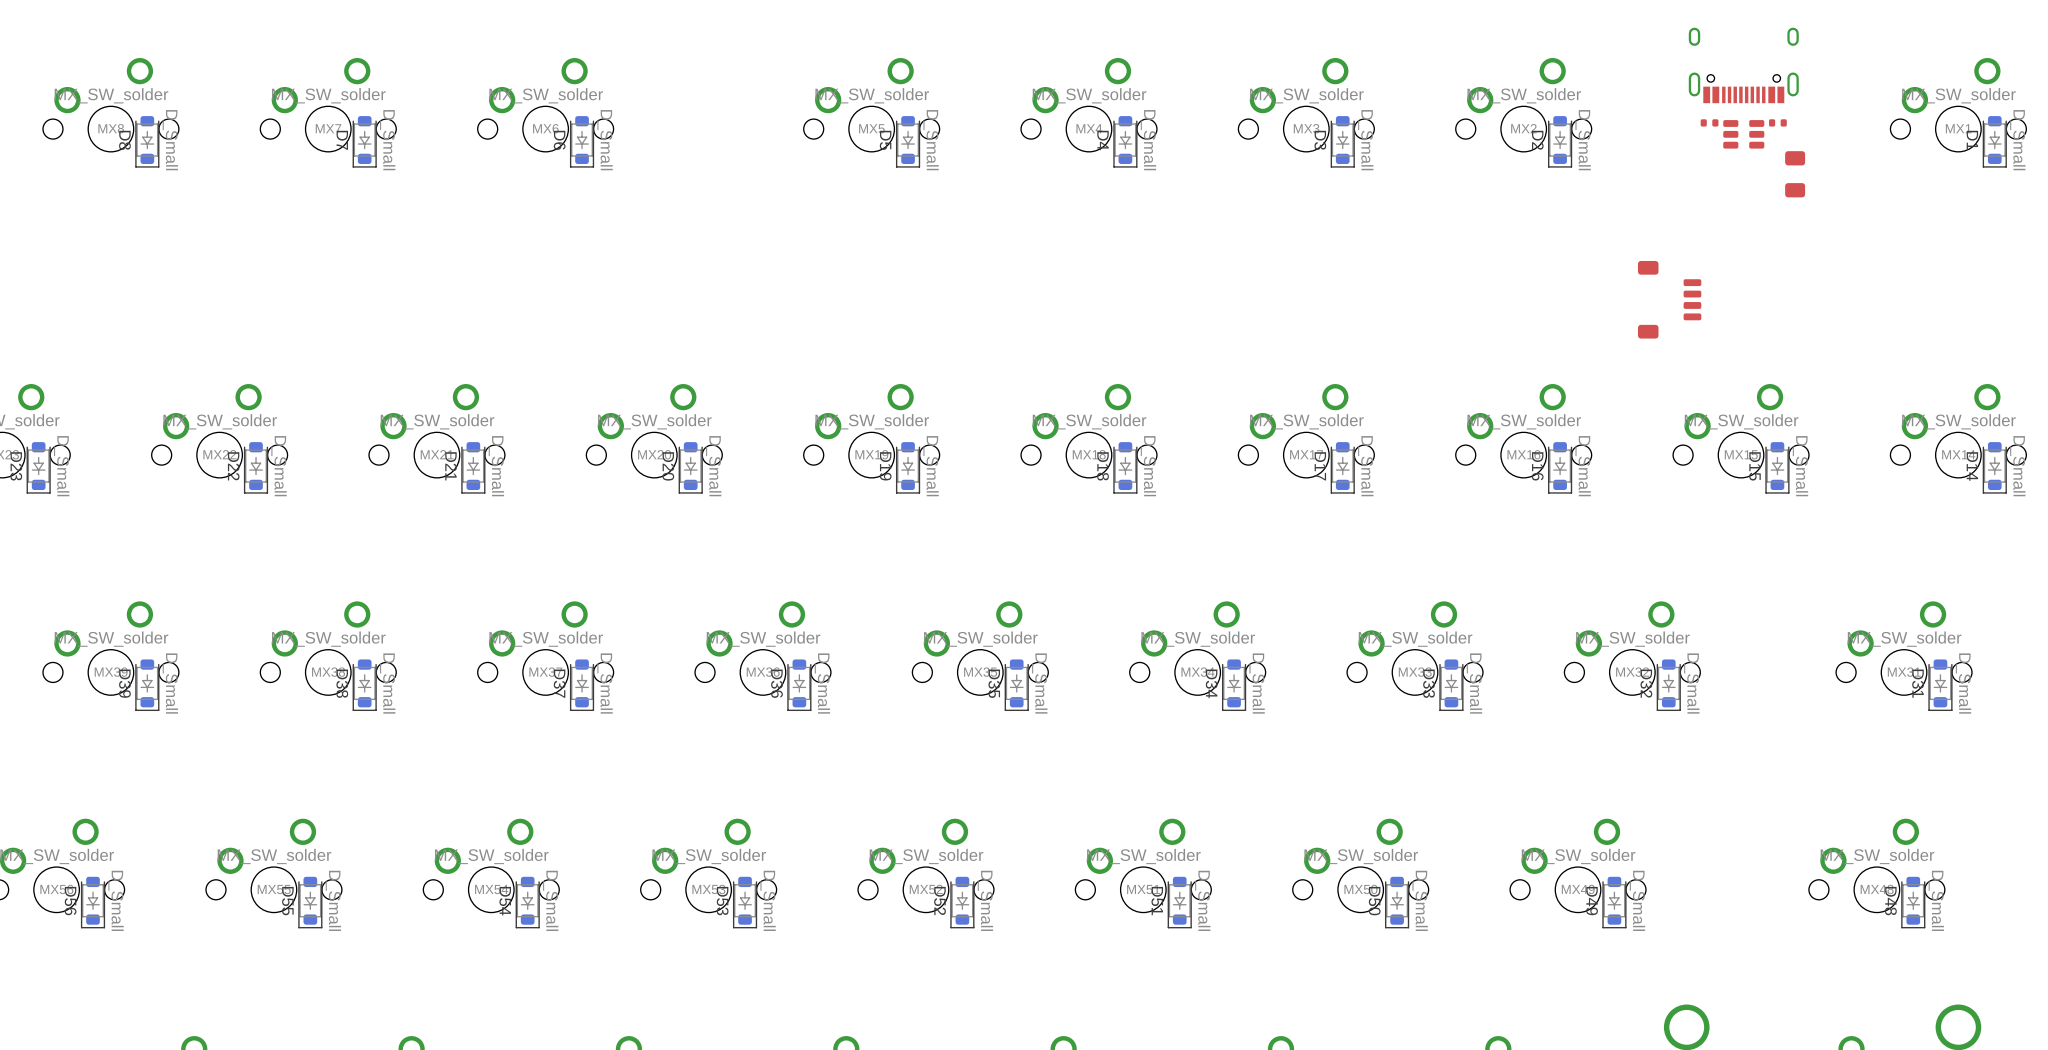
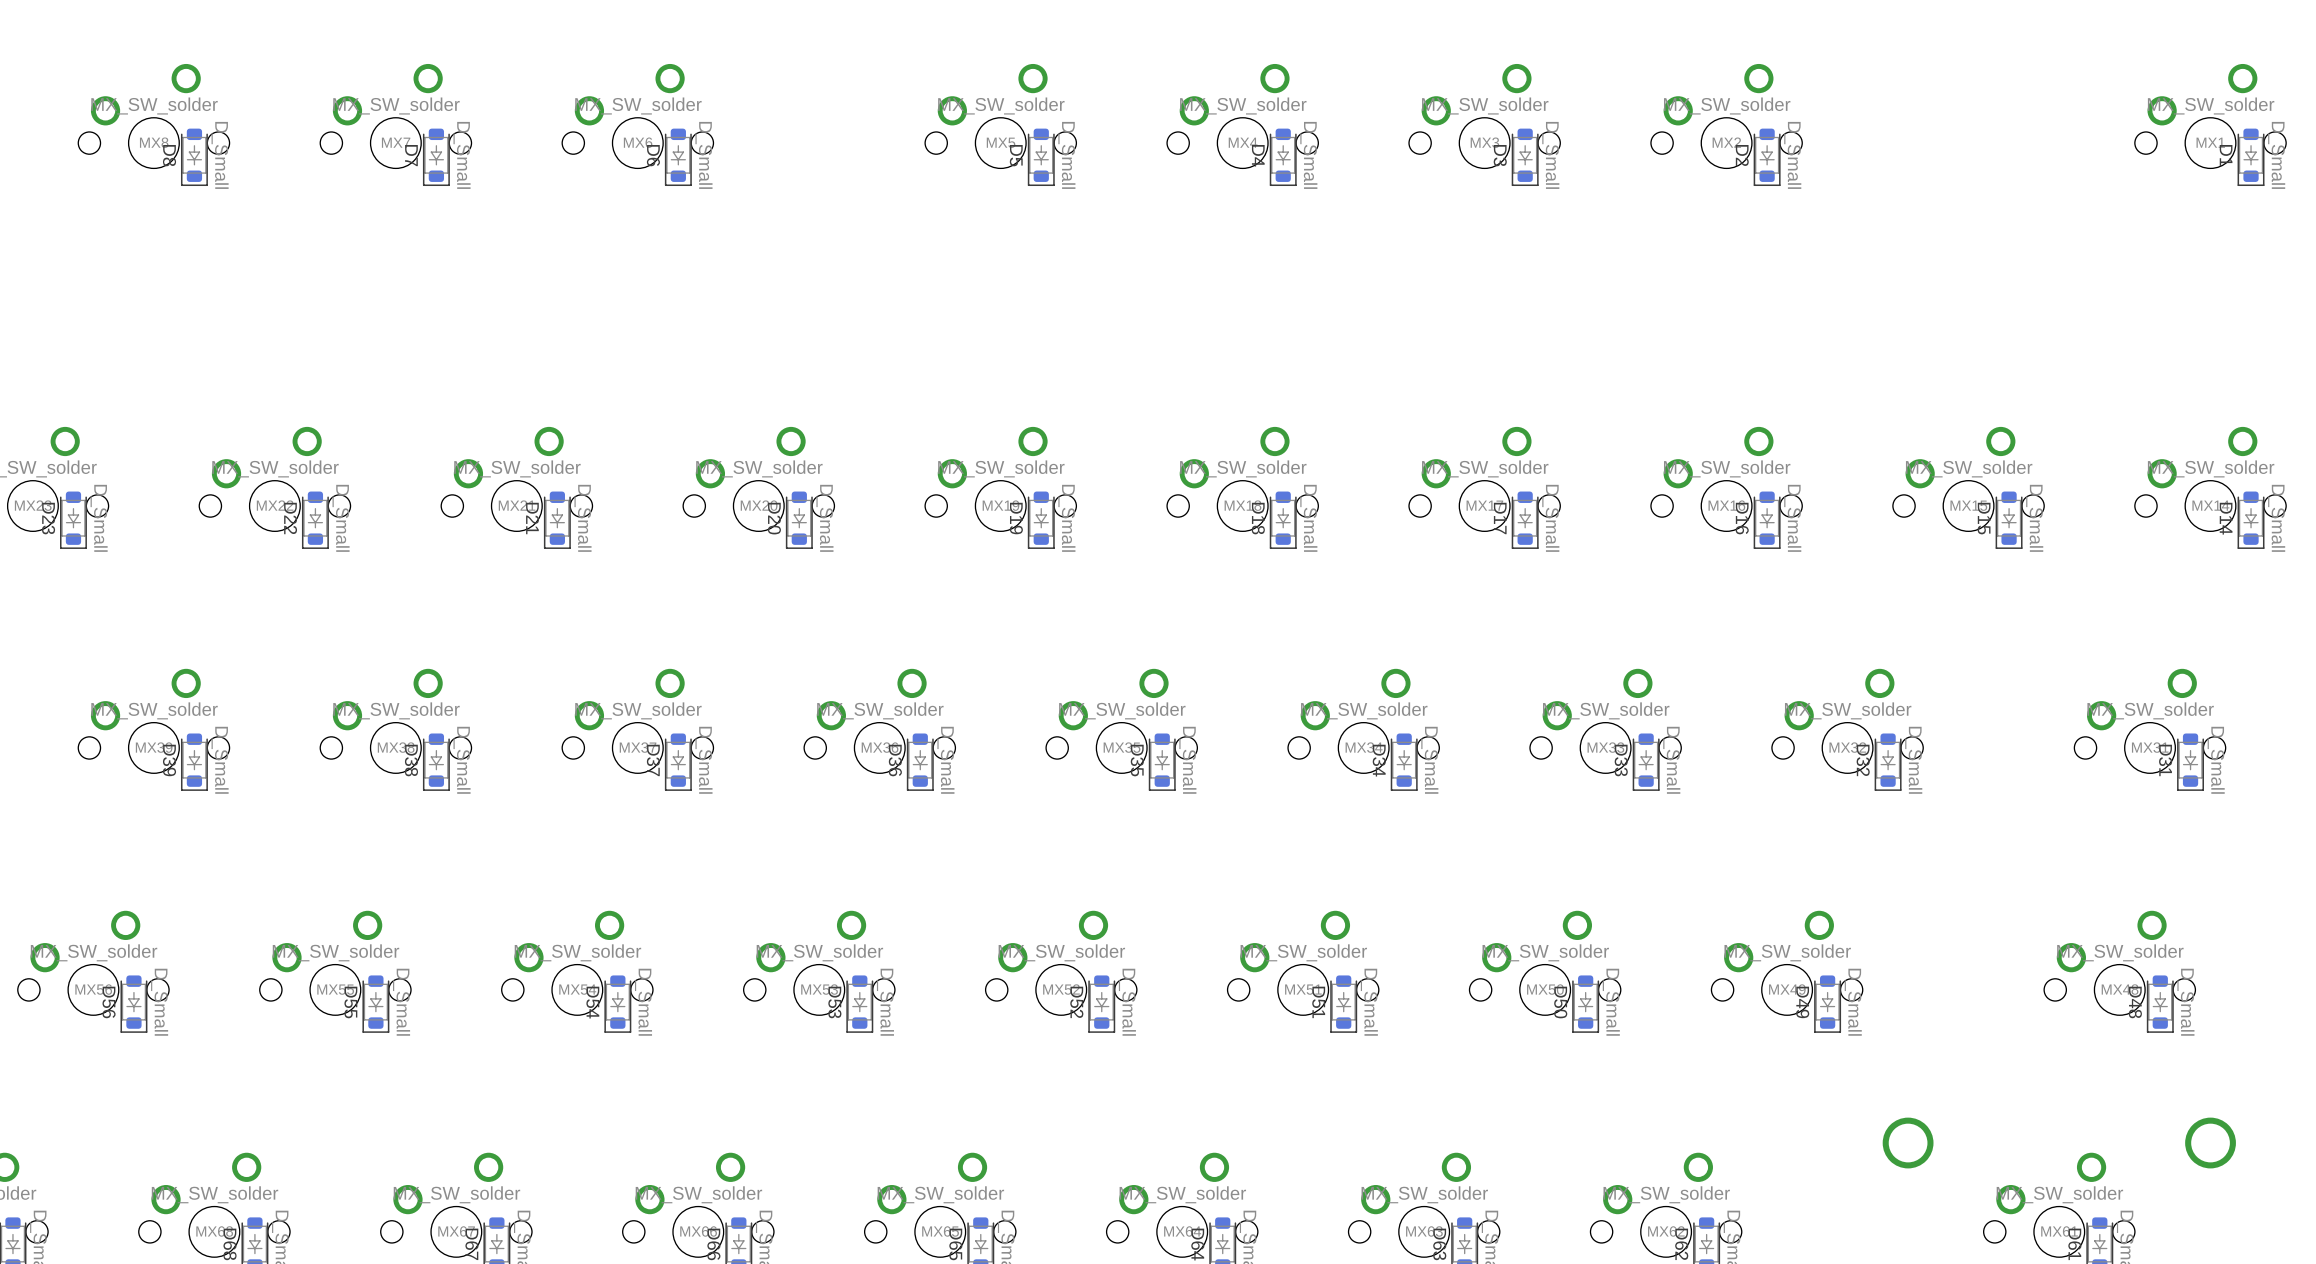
part: (1743, 65) -> none
part: (1709, 122) -> none
part: (1777, 122) -> none
part: (1743, 134) -> none
part: (1795, 174) -> none
part: (1669, 299) -> none

